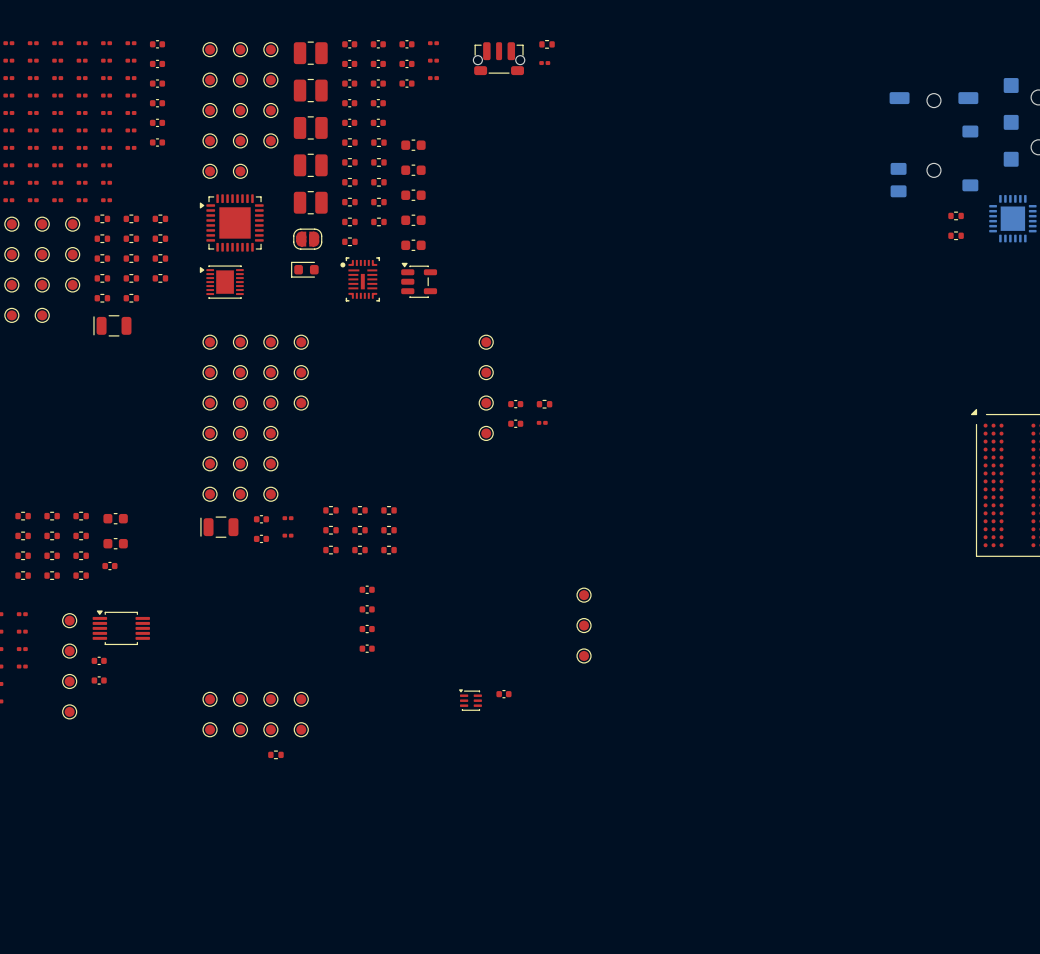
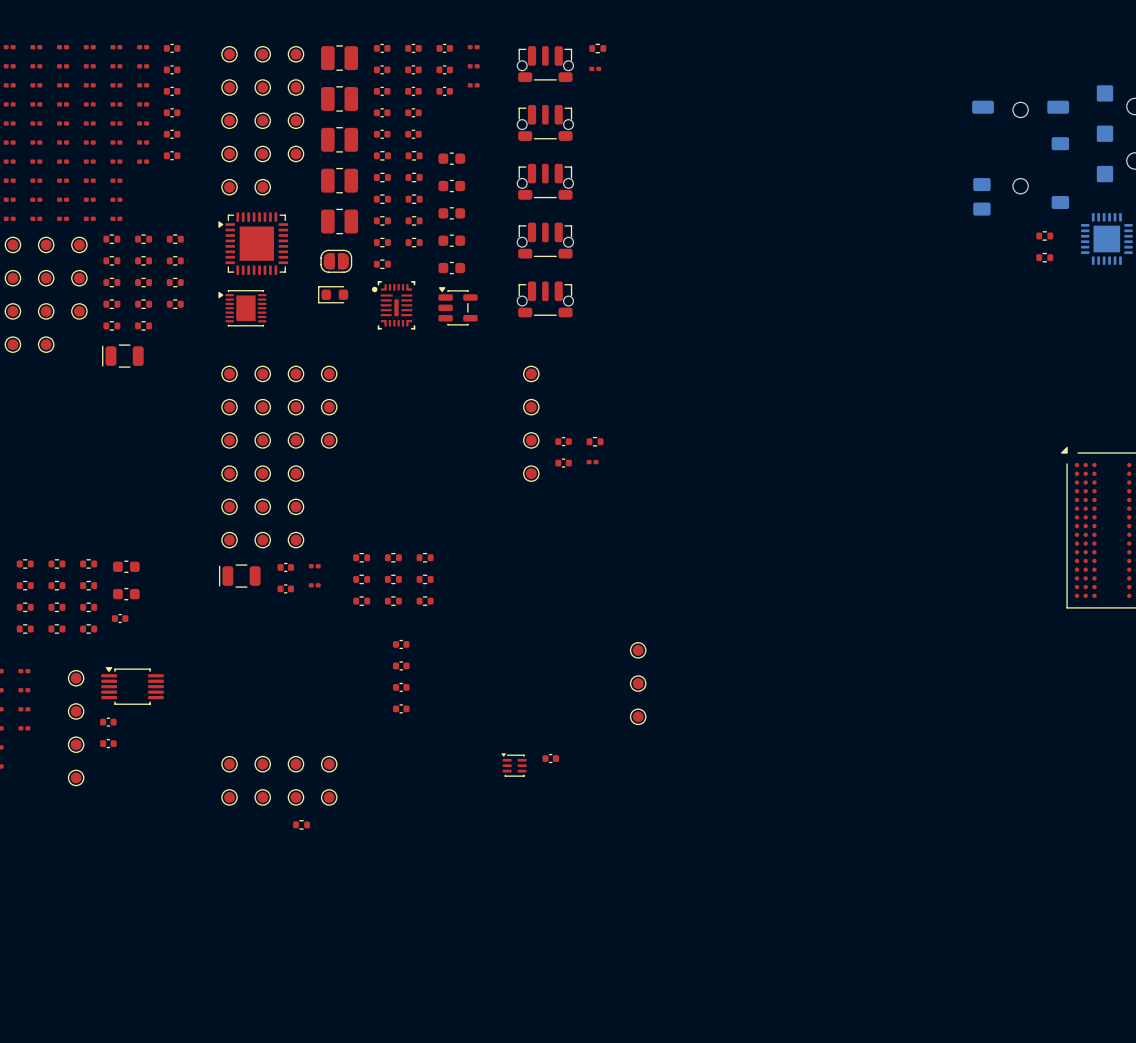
part: none -> (545, 122)
part: none -> (545, 181)
part: none -> (545, 240)
part: none -> (545, 299)

